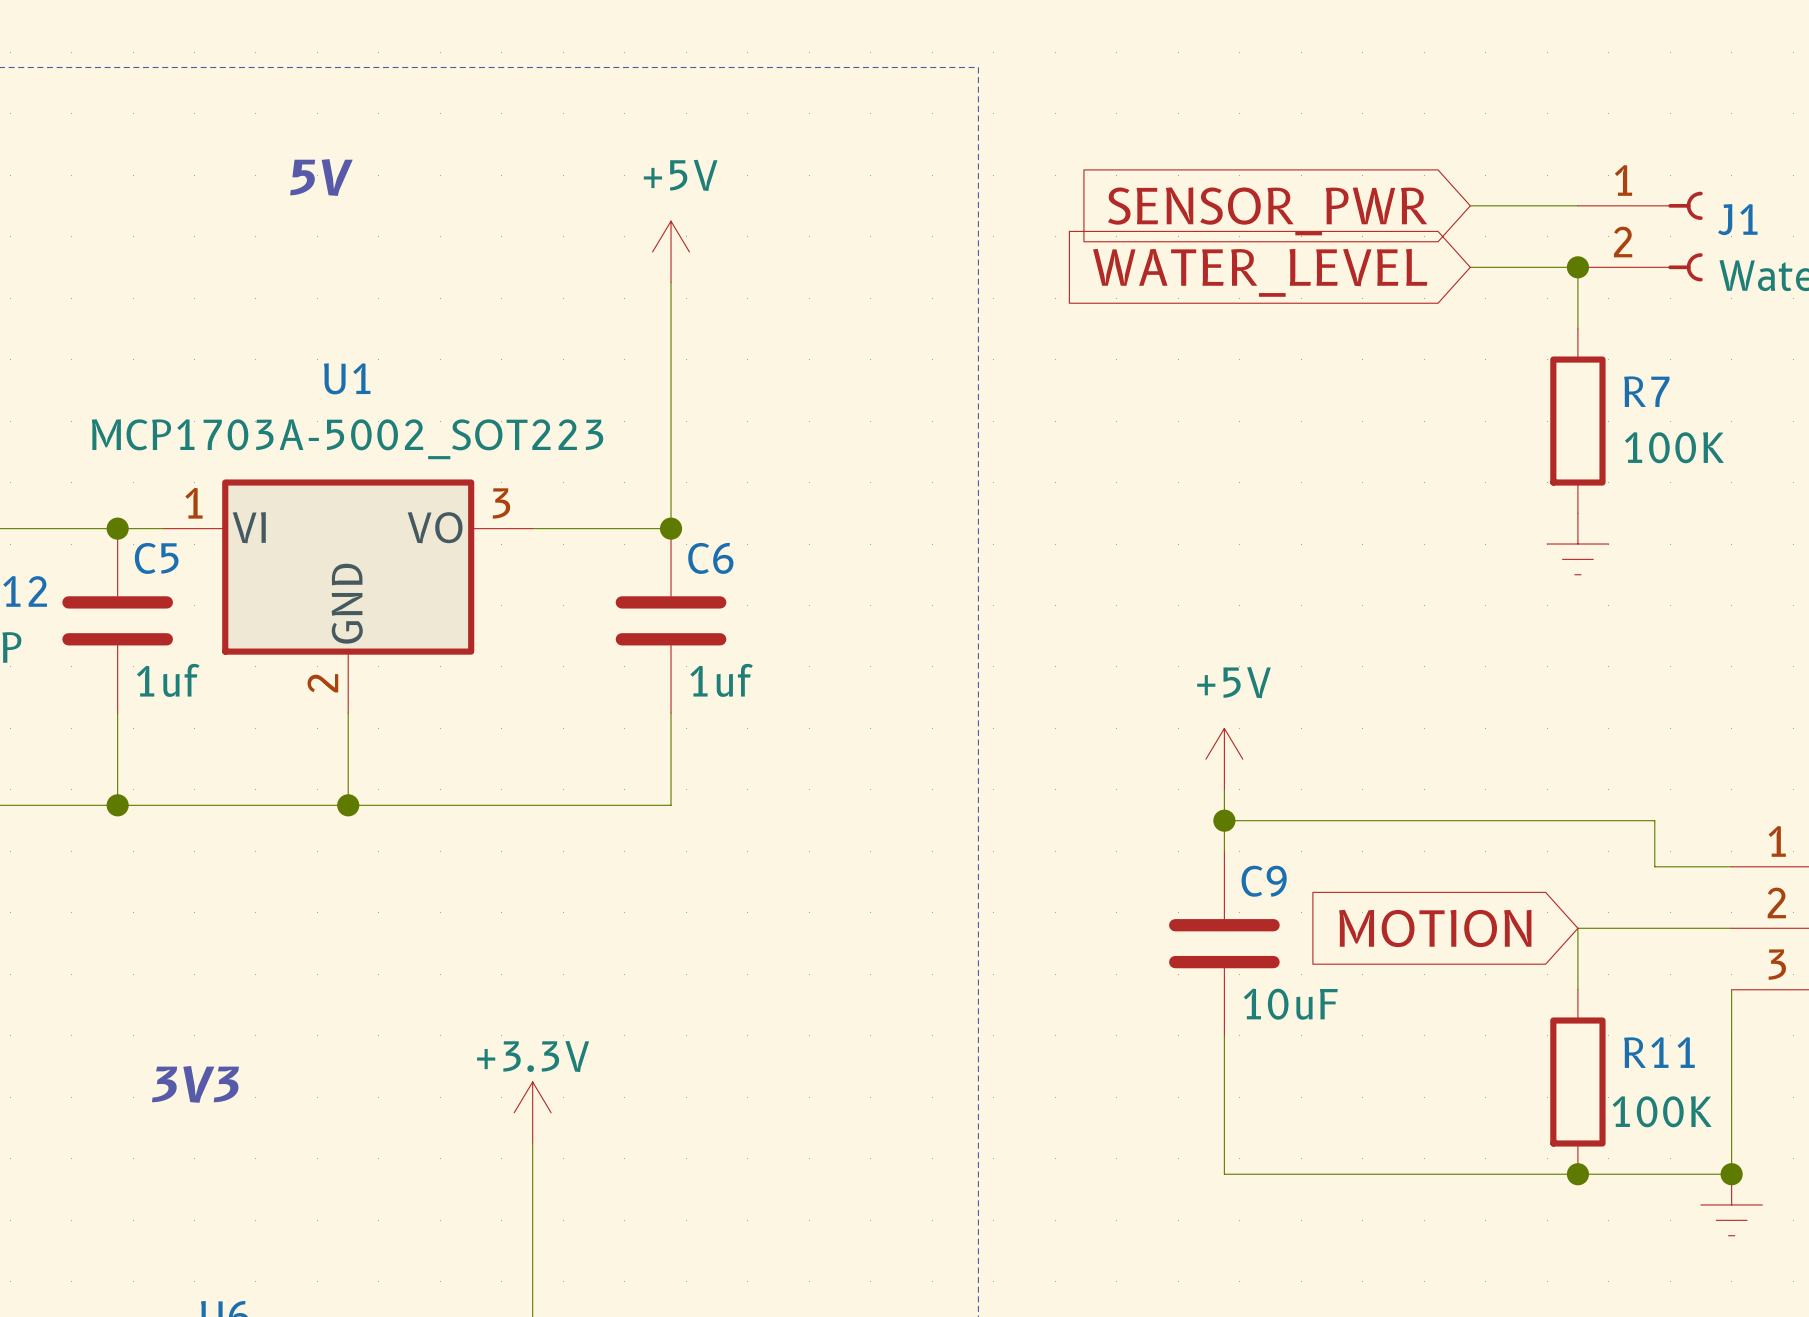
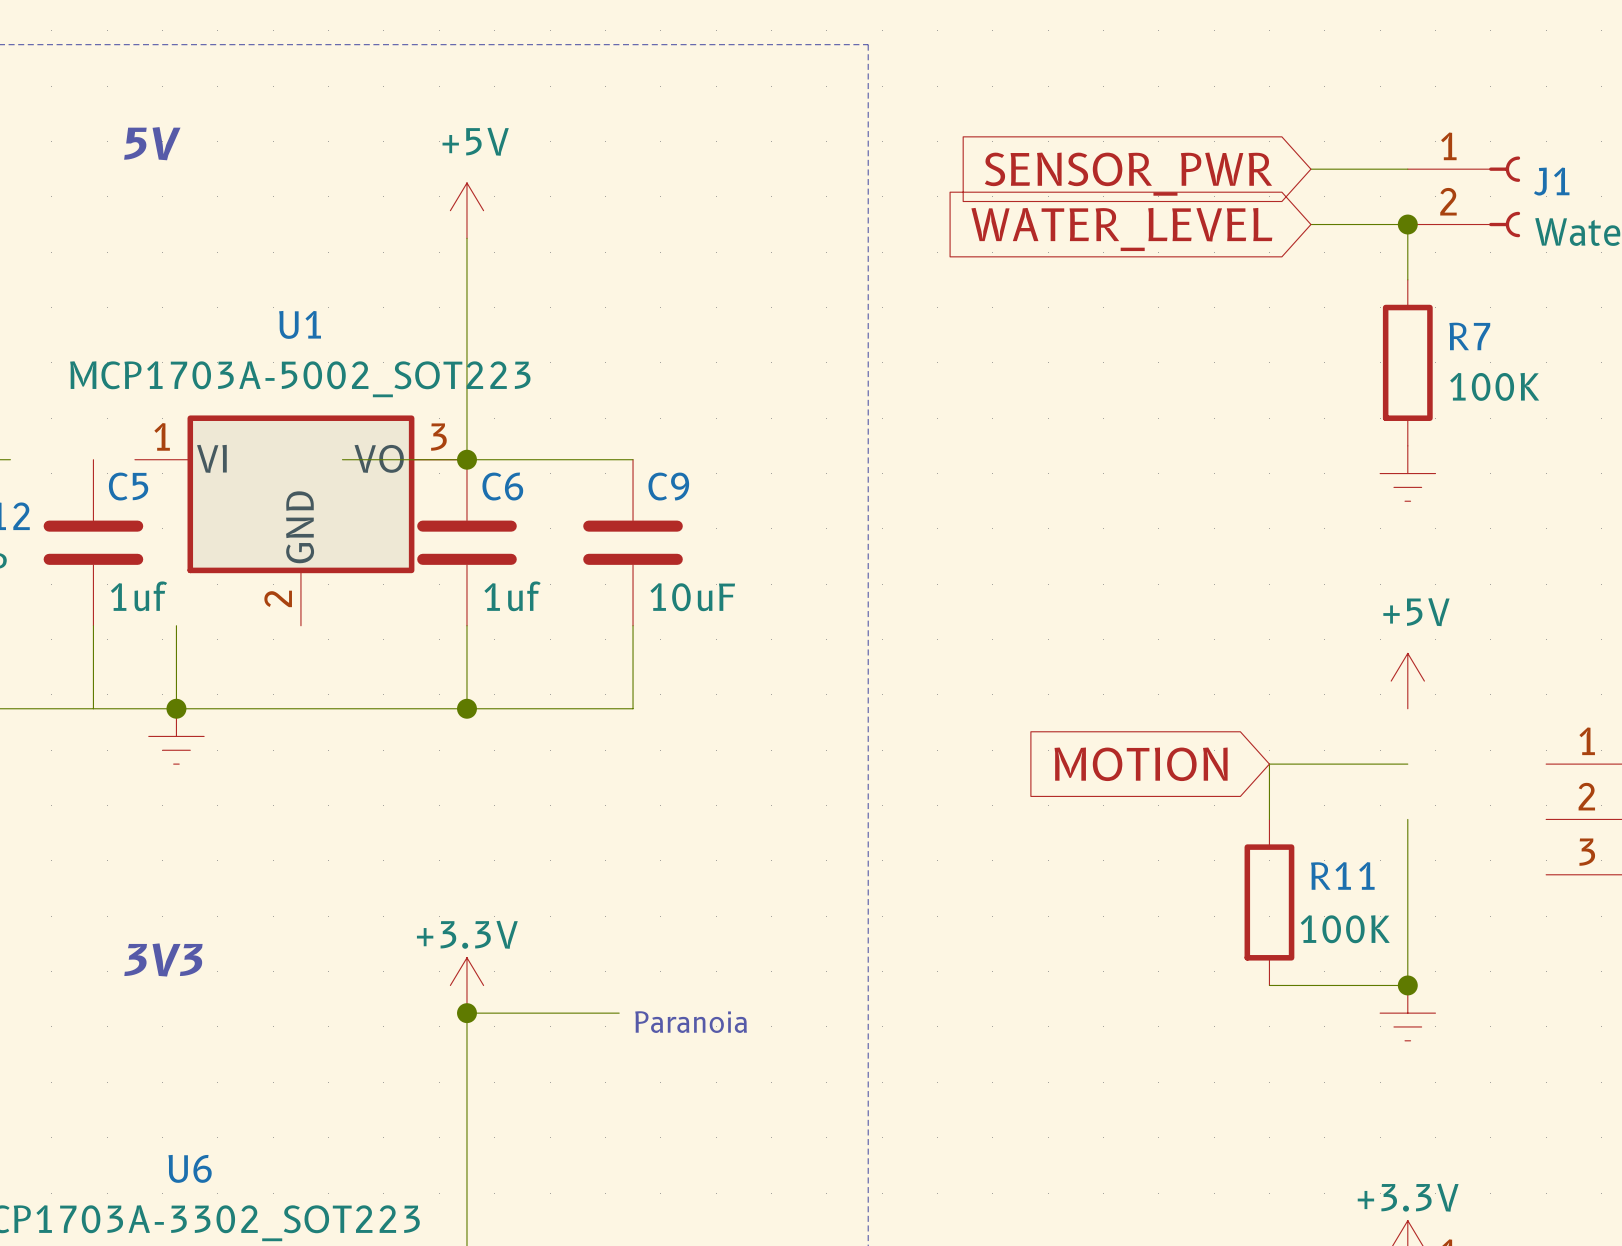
text position: 5V (321, 177) -> 5V (152, 143)
power symbol position: +5V (671, 251) -> +5V (466, 210)
wire: none -> (466, 238) (466, 459) (342, 459)
wire: (671, 282) (671, 528) -> (633, 459) (591, 459)
wire: (25, 528) (163, 528) -> none
junction: (117, 528) -> none
junction position: (671, 528) -> (466, 459)
C6 position: (671, 620) -> (466, 542)
wire: (348, 713) (348, 805) -> (176, 625) (176, 708)
wire: none -> (466, 625) (466, 708)
wire: (671, 713) (671, 805) -> (633, 625) (633, 708) (591, 708)
power symbol position: +5V (1224, 759) -> +5V (1407, 681)
wire: (1224, 789) (1224, 851) -> none
junction: (117, 805) -> none
junction: none -> (176, 708)
junction: (348, 805) -> none
junction: none -> (466, 708)
wire: (1224, 820) (1654, 820) (1654, 866) (1731, 866) -> none
junction: (1224, 820) -> none
power symbol: none -> (176, 736)
wire: none -> (1407, 764) (1269, 764) (1269, 819)
global label position: MOTION (1435, 928) -> MOTION (1141, 764)
wire: (1577, 928) (1731, 928) -> none
C9 position: (1224, 943) -> (633, 542)
wire: none -> (1407, 874) (1407, 985) (1269, 985)
wire: (1731, 989) (1731, 1174) (1224, 1174) (1224, 1035) -> none
R11 position: (1577, 1082) -> (1269, 902)
wire: none -> (466, 1013) (619, 1013)
junction: none -> (466, 1013)
text: none -> Paranoia (691, 1022)
junction position: (1577, 1174) -> (1407, 985)
junction: (1731, 1174) -> none
power symbol position: (1731, 1204) -> (1407, 1013)

